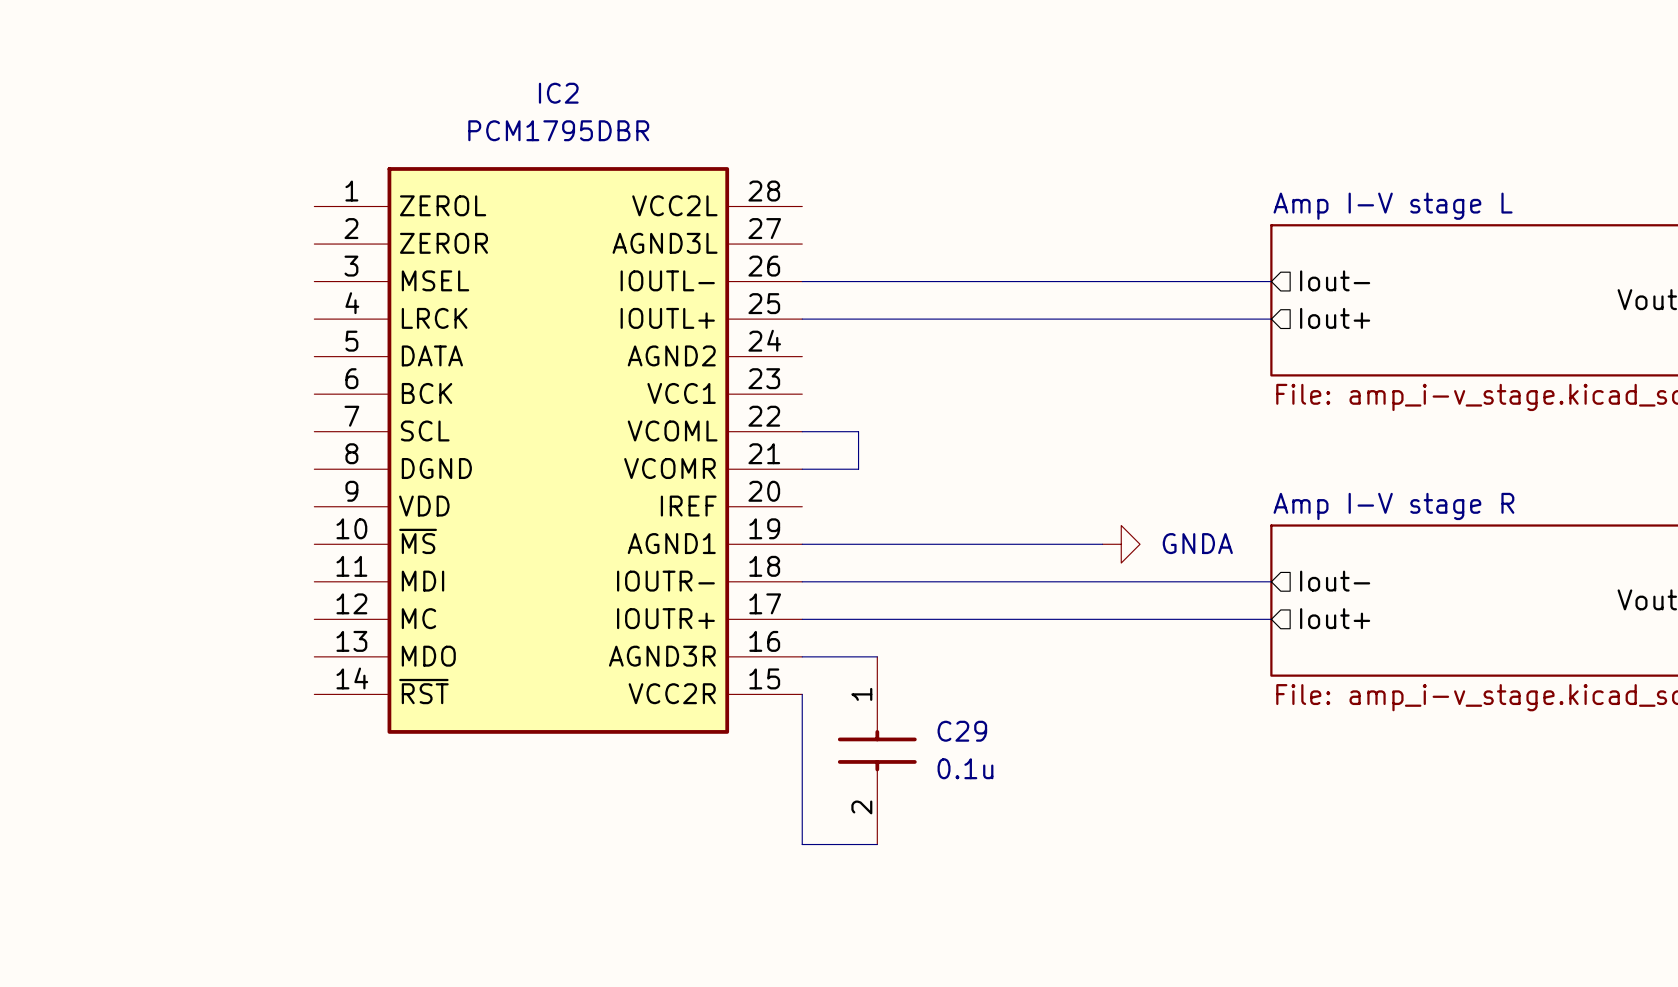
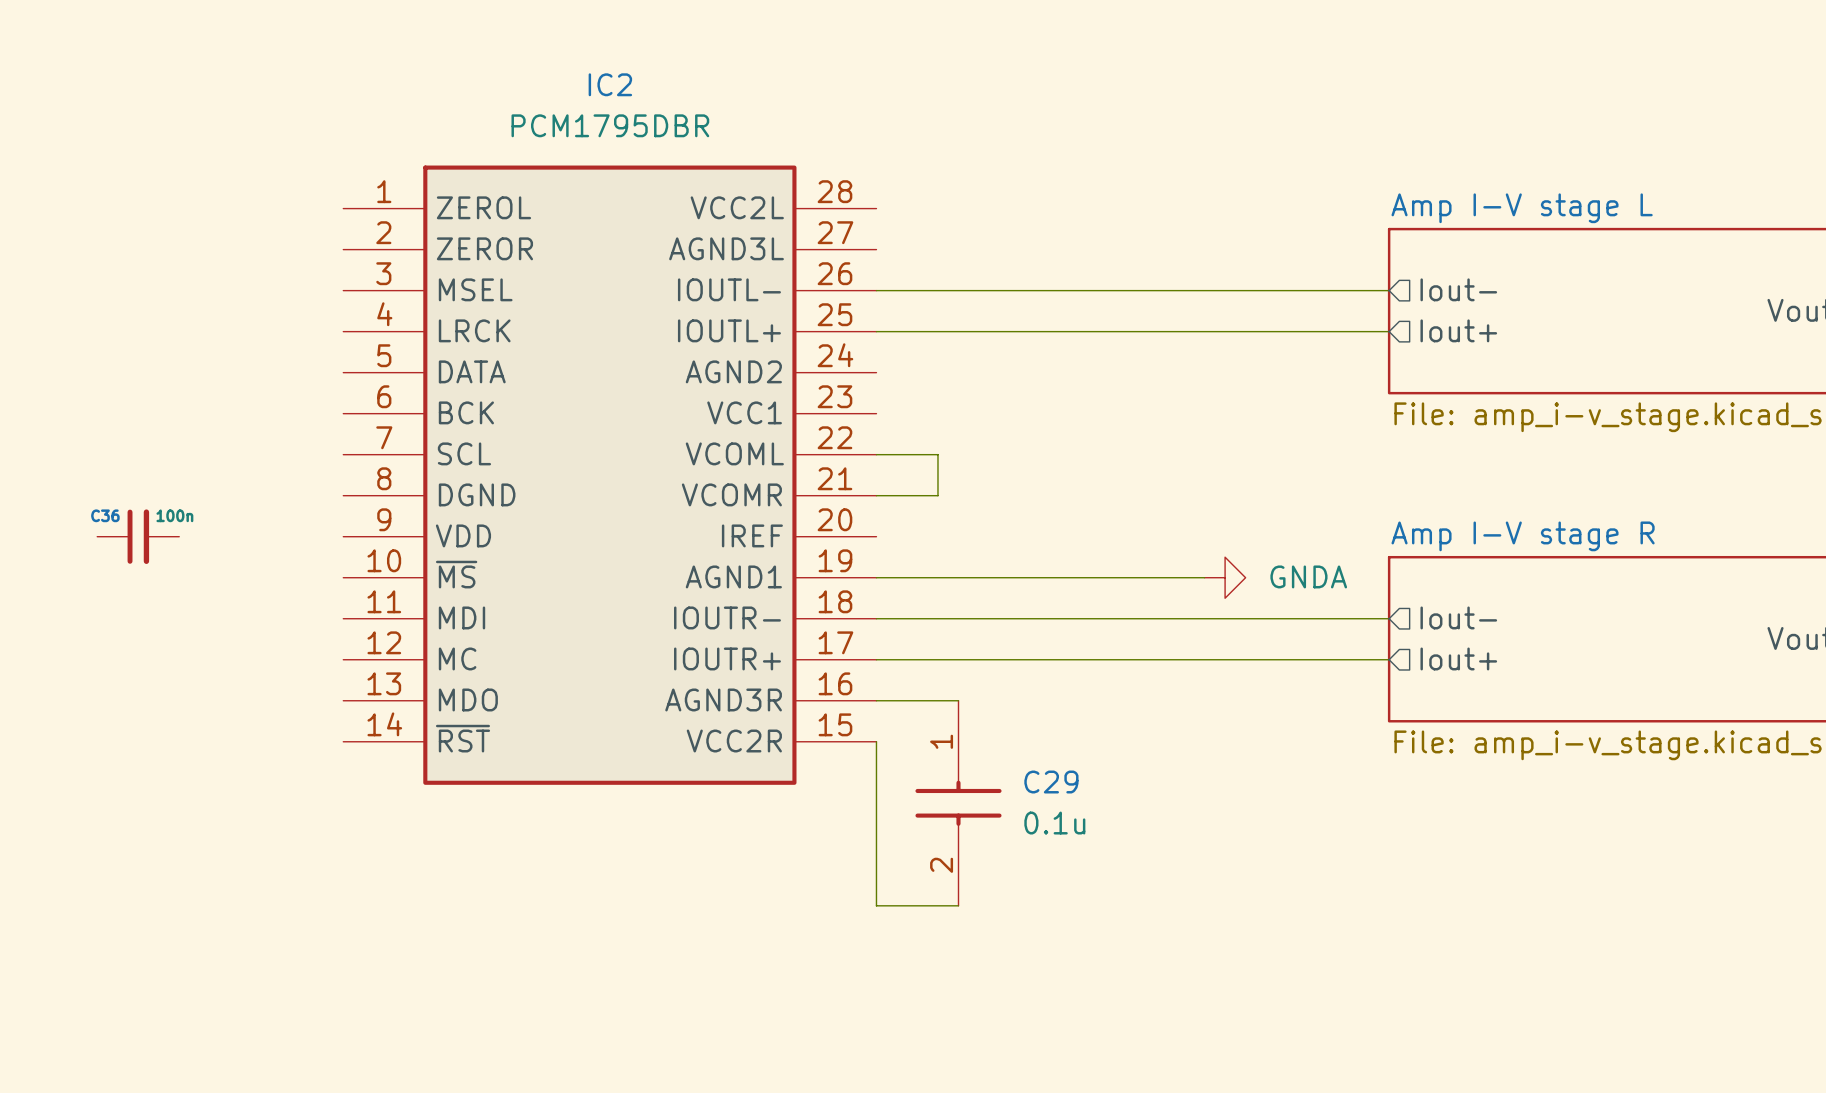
C36: none -> 100n (138, 536)

